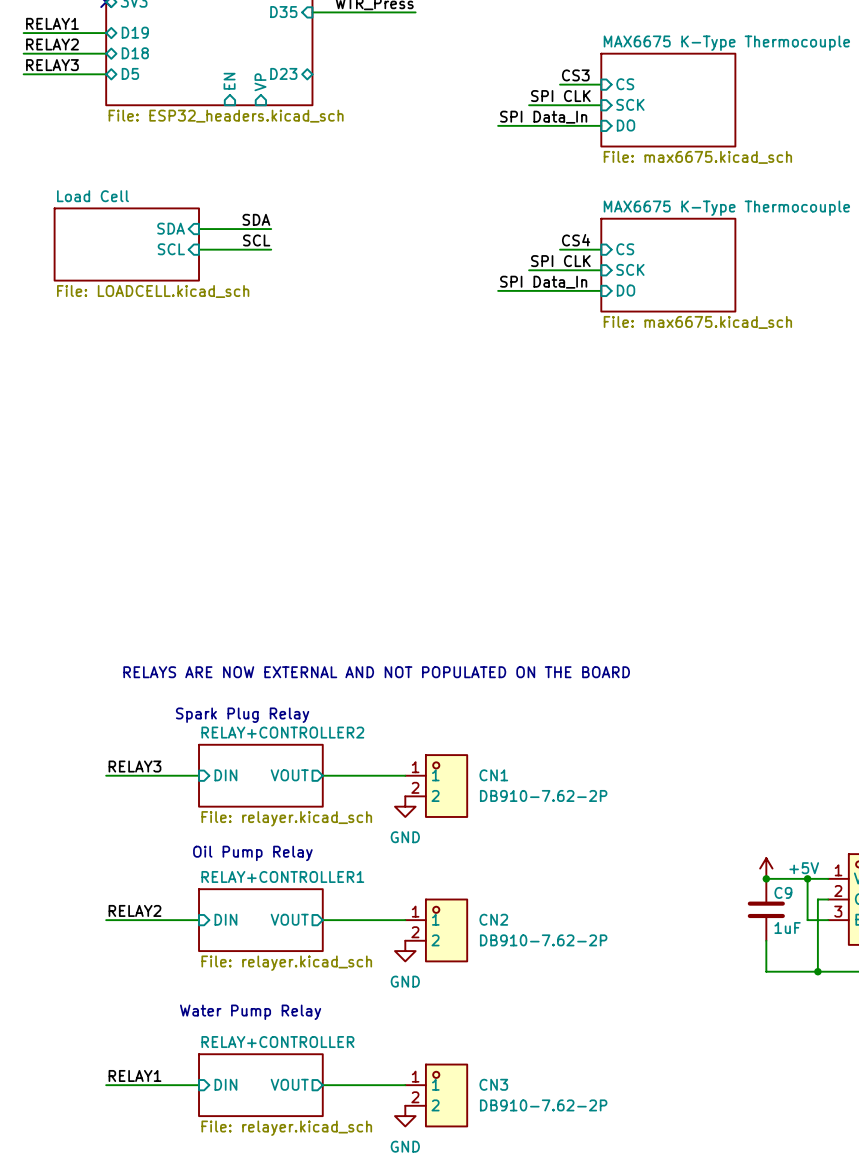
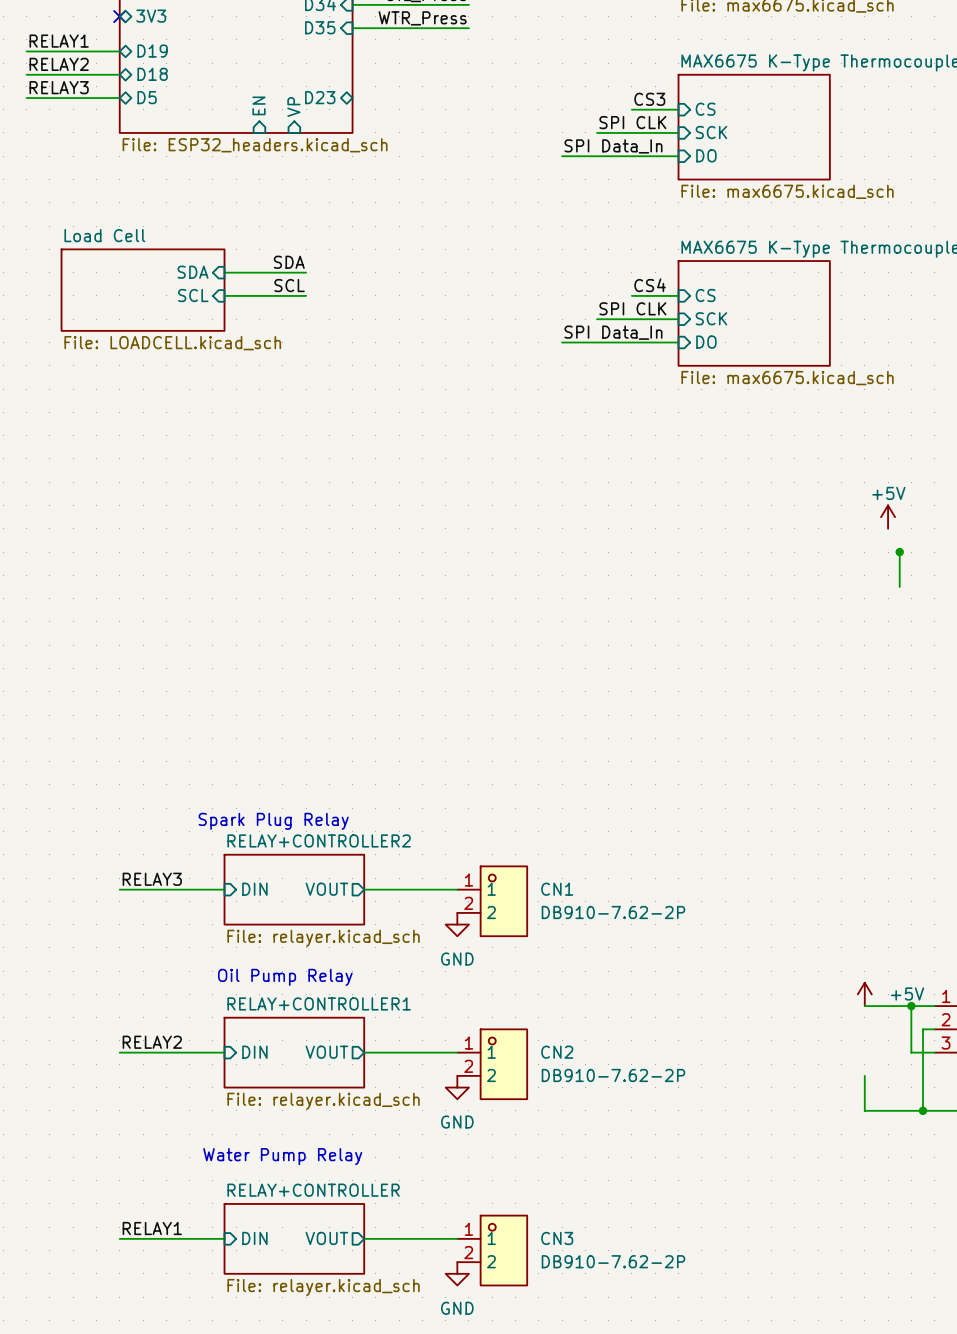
power symbol: none -> +5V (888, 517)
wire: none -> (899, 552) (899, 586)
junction: none -> (899, 552)
text: RELAYS ARE NOW EXTERNAL AND NOT POPULATED ON THE BOARD (376, 672) -> none
junction: (766, 878) -> none
C9: 1uF (766, 909) -> none

